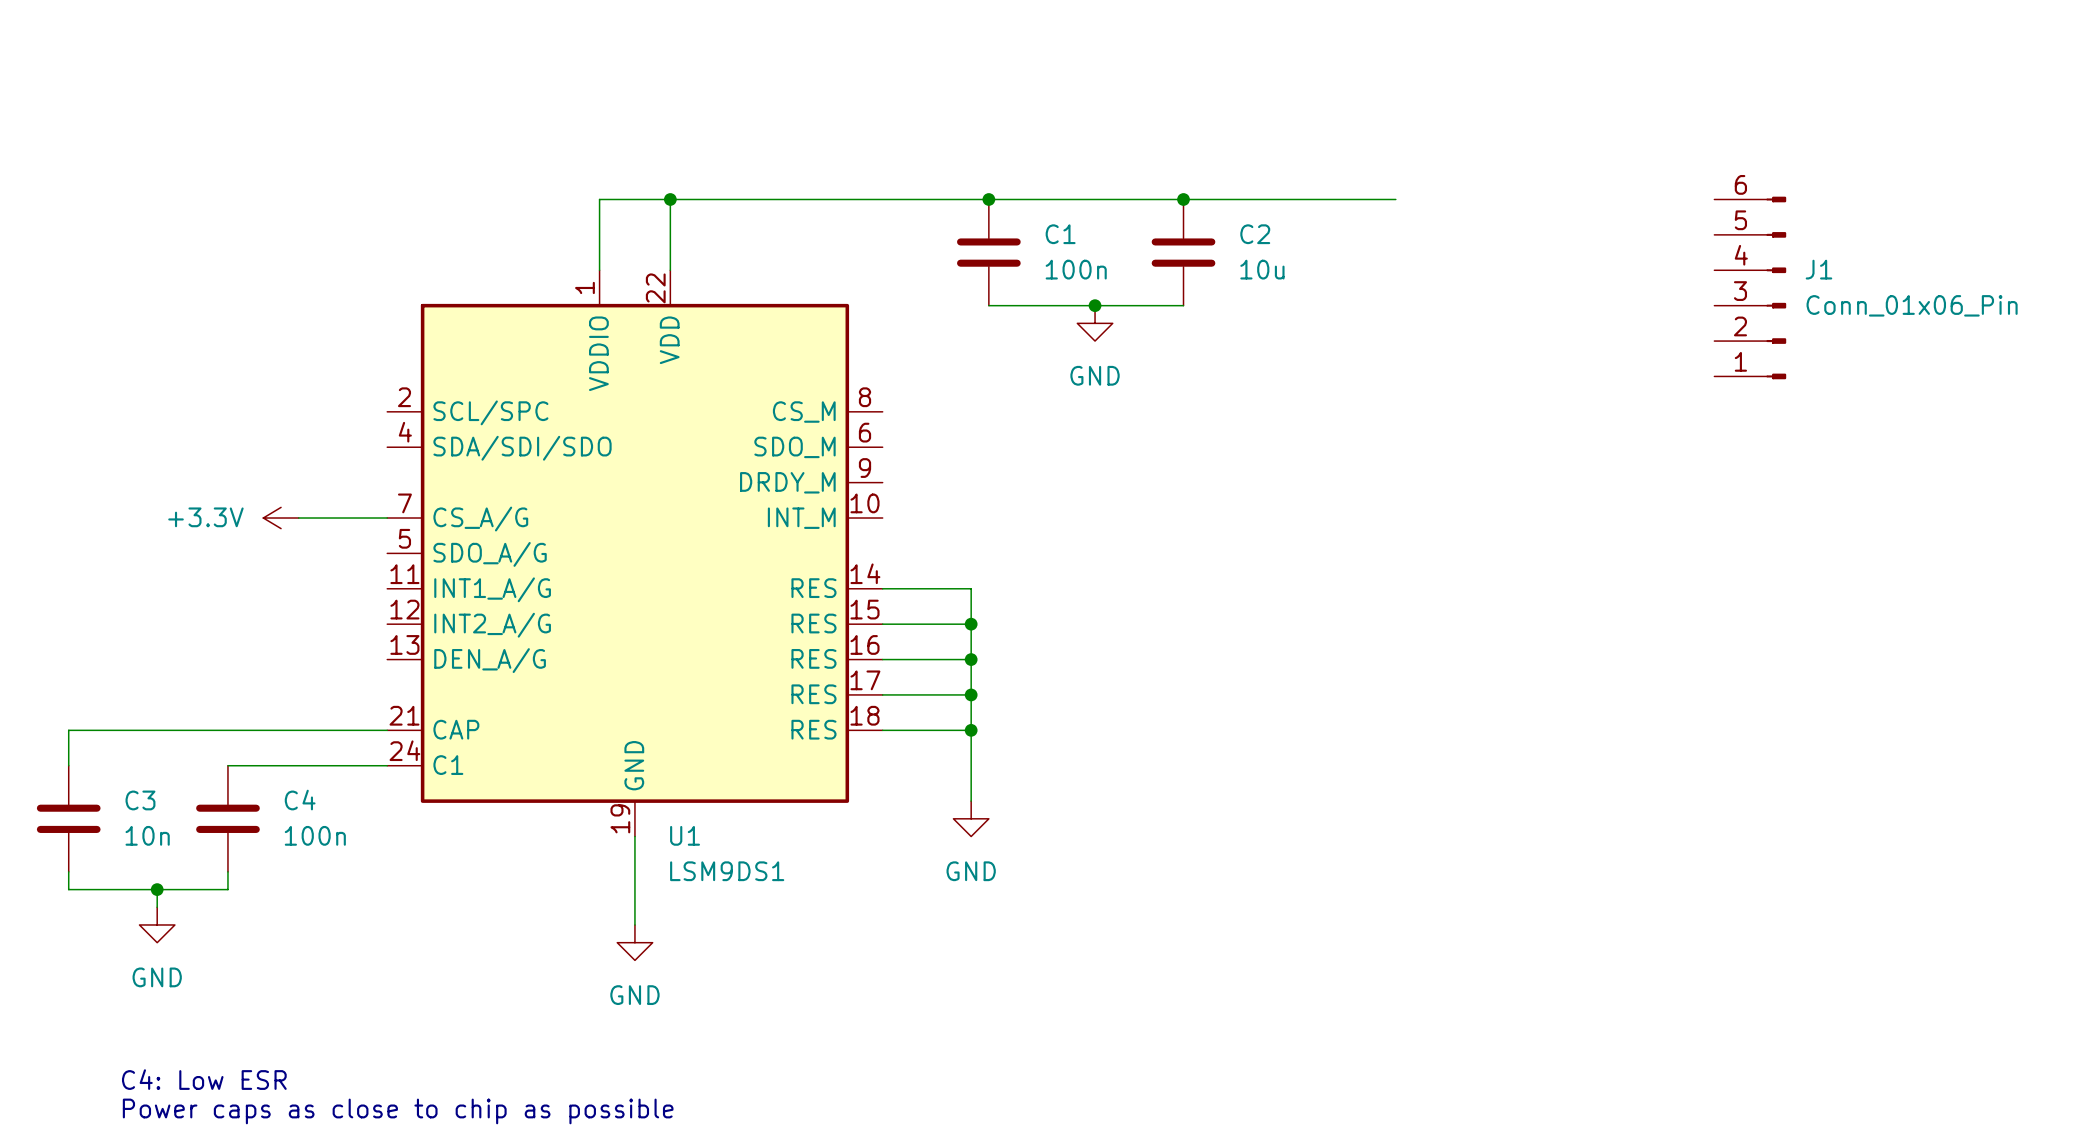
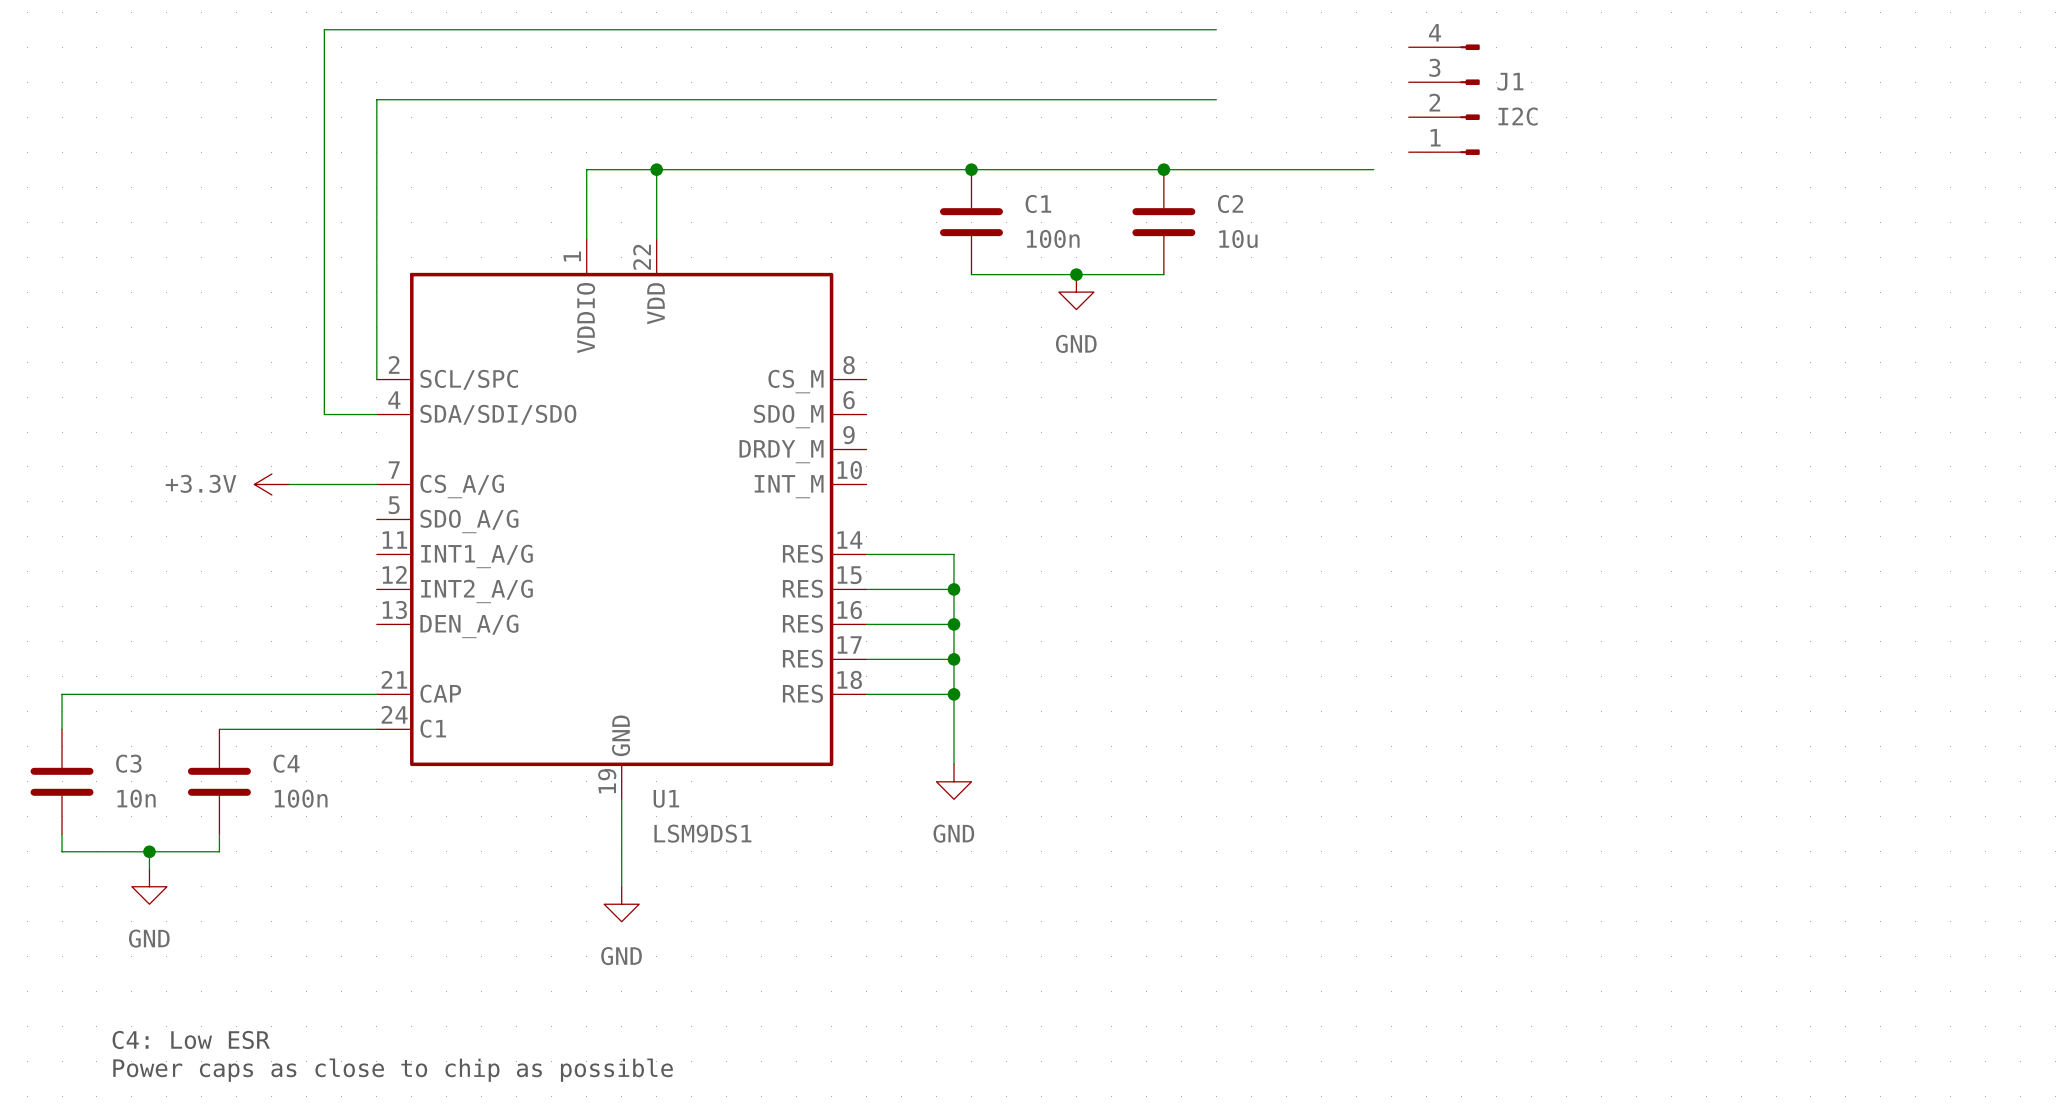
wire: none -> (1216, 29) (324, 29) (324, 414) (376, 414)
wire: none -> (1216, 99) (376, 99) (376, 379)
J1 symbol: [1714, 196, 1787, 380] -> [1408, 44, 1480, 155]
J1 value: Conn_01x06_Pin (1912, 305) -> I2C (1518, 116)

